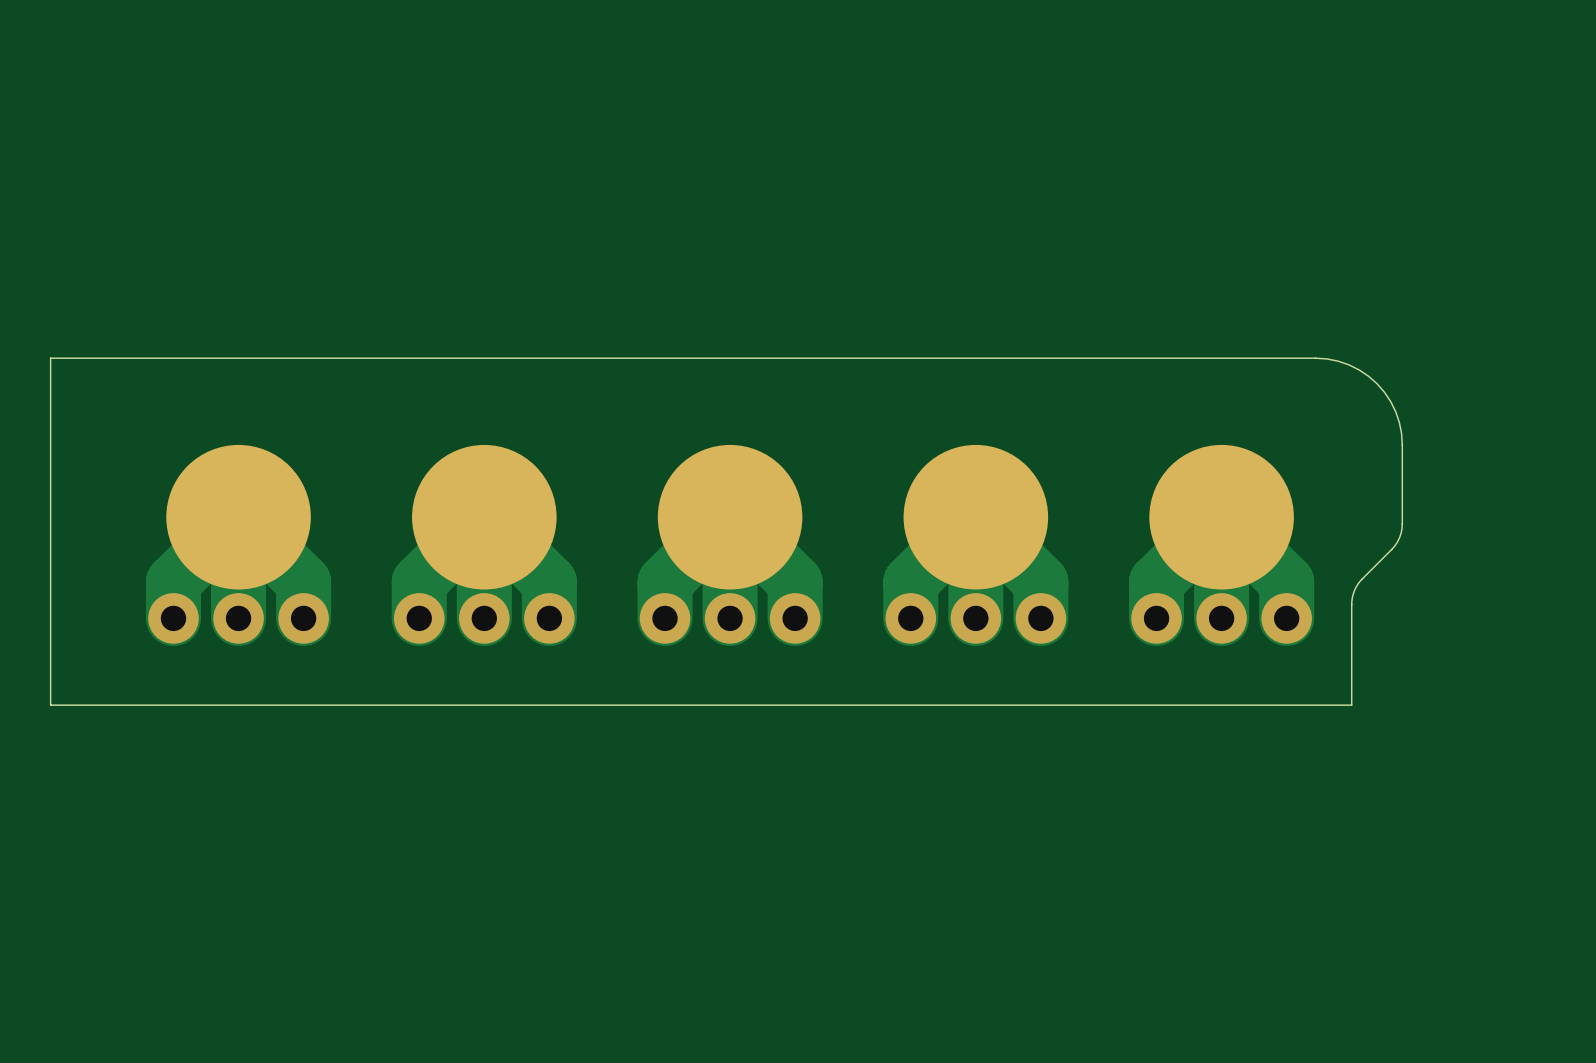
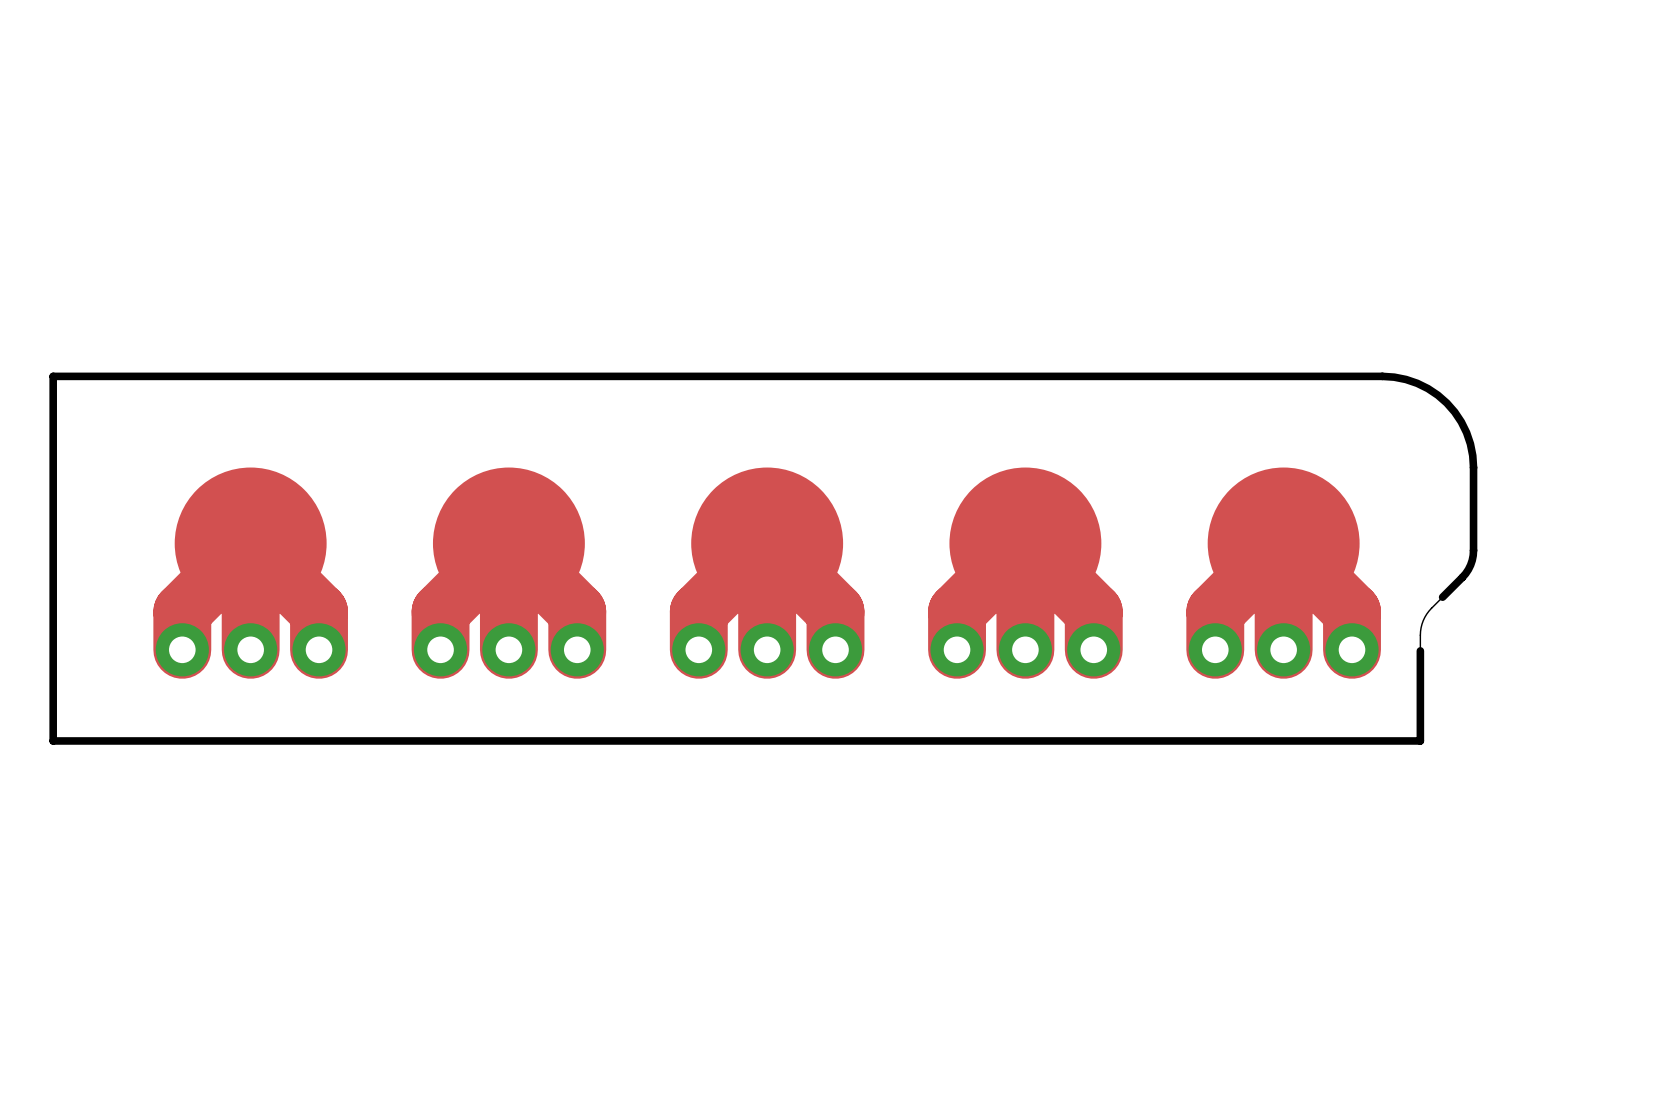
board edge width: thin (1372, 568) (1394, 545) (1402, 528) (1402, 444) (1399, 422) (1390, 401) (1376, 383) (1348, 364) (1326, 358) (50, 358) (50, 705) (1351, 705) (1351, 619) -> thick (1442, 597) (1465, 573) (1473, 555) (1473, 467) (1470, 443) (1461, 421) (1446, 403) (1427, 388) (1417, 383) (1394, 377) (53, 376) (53, 740) (1420, 740) (1420, 650)

